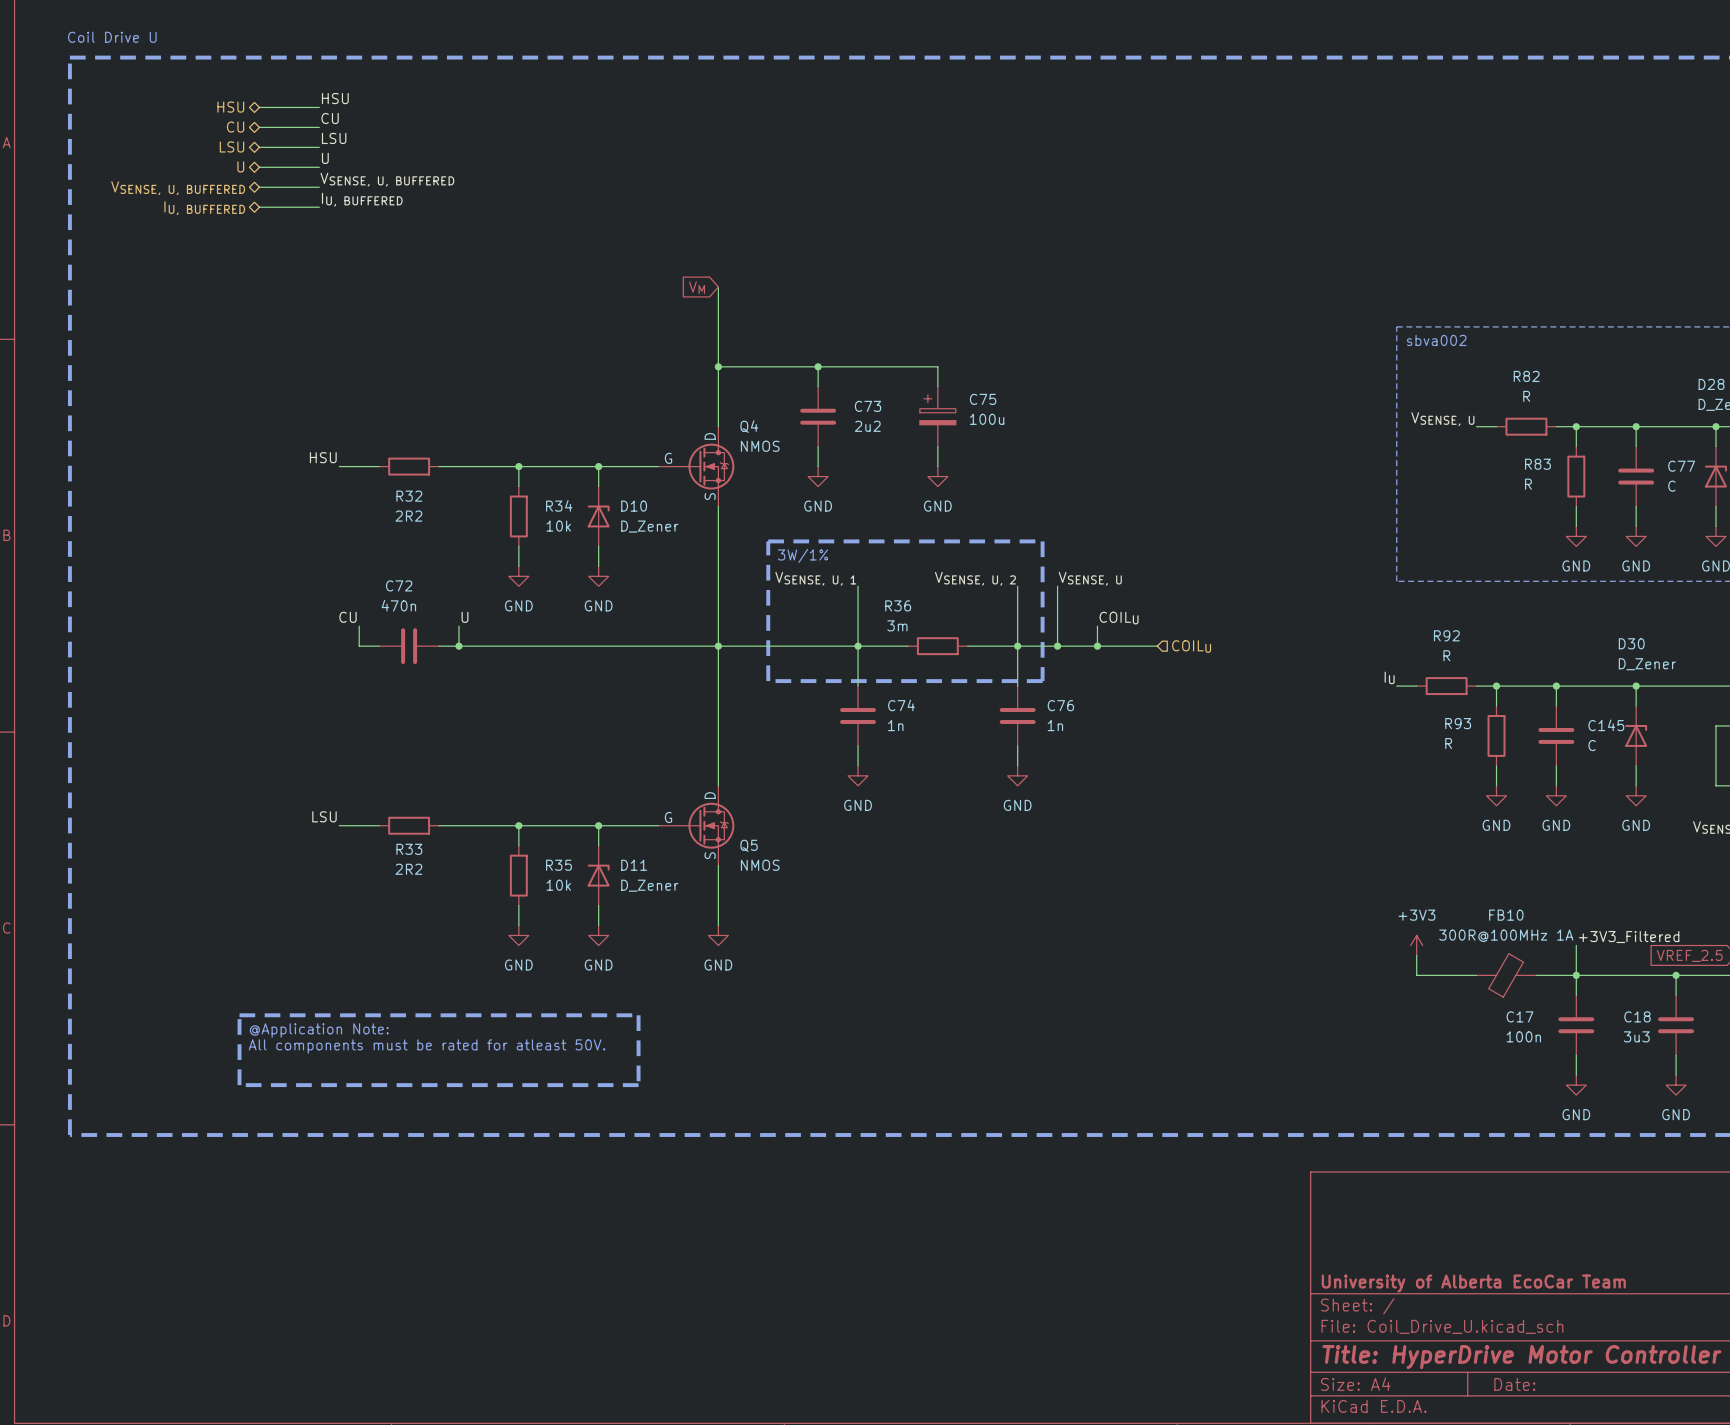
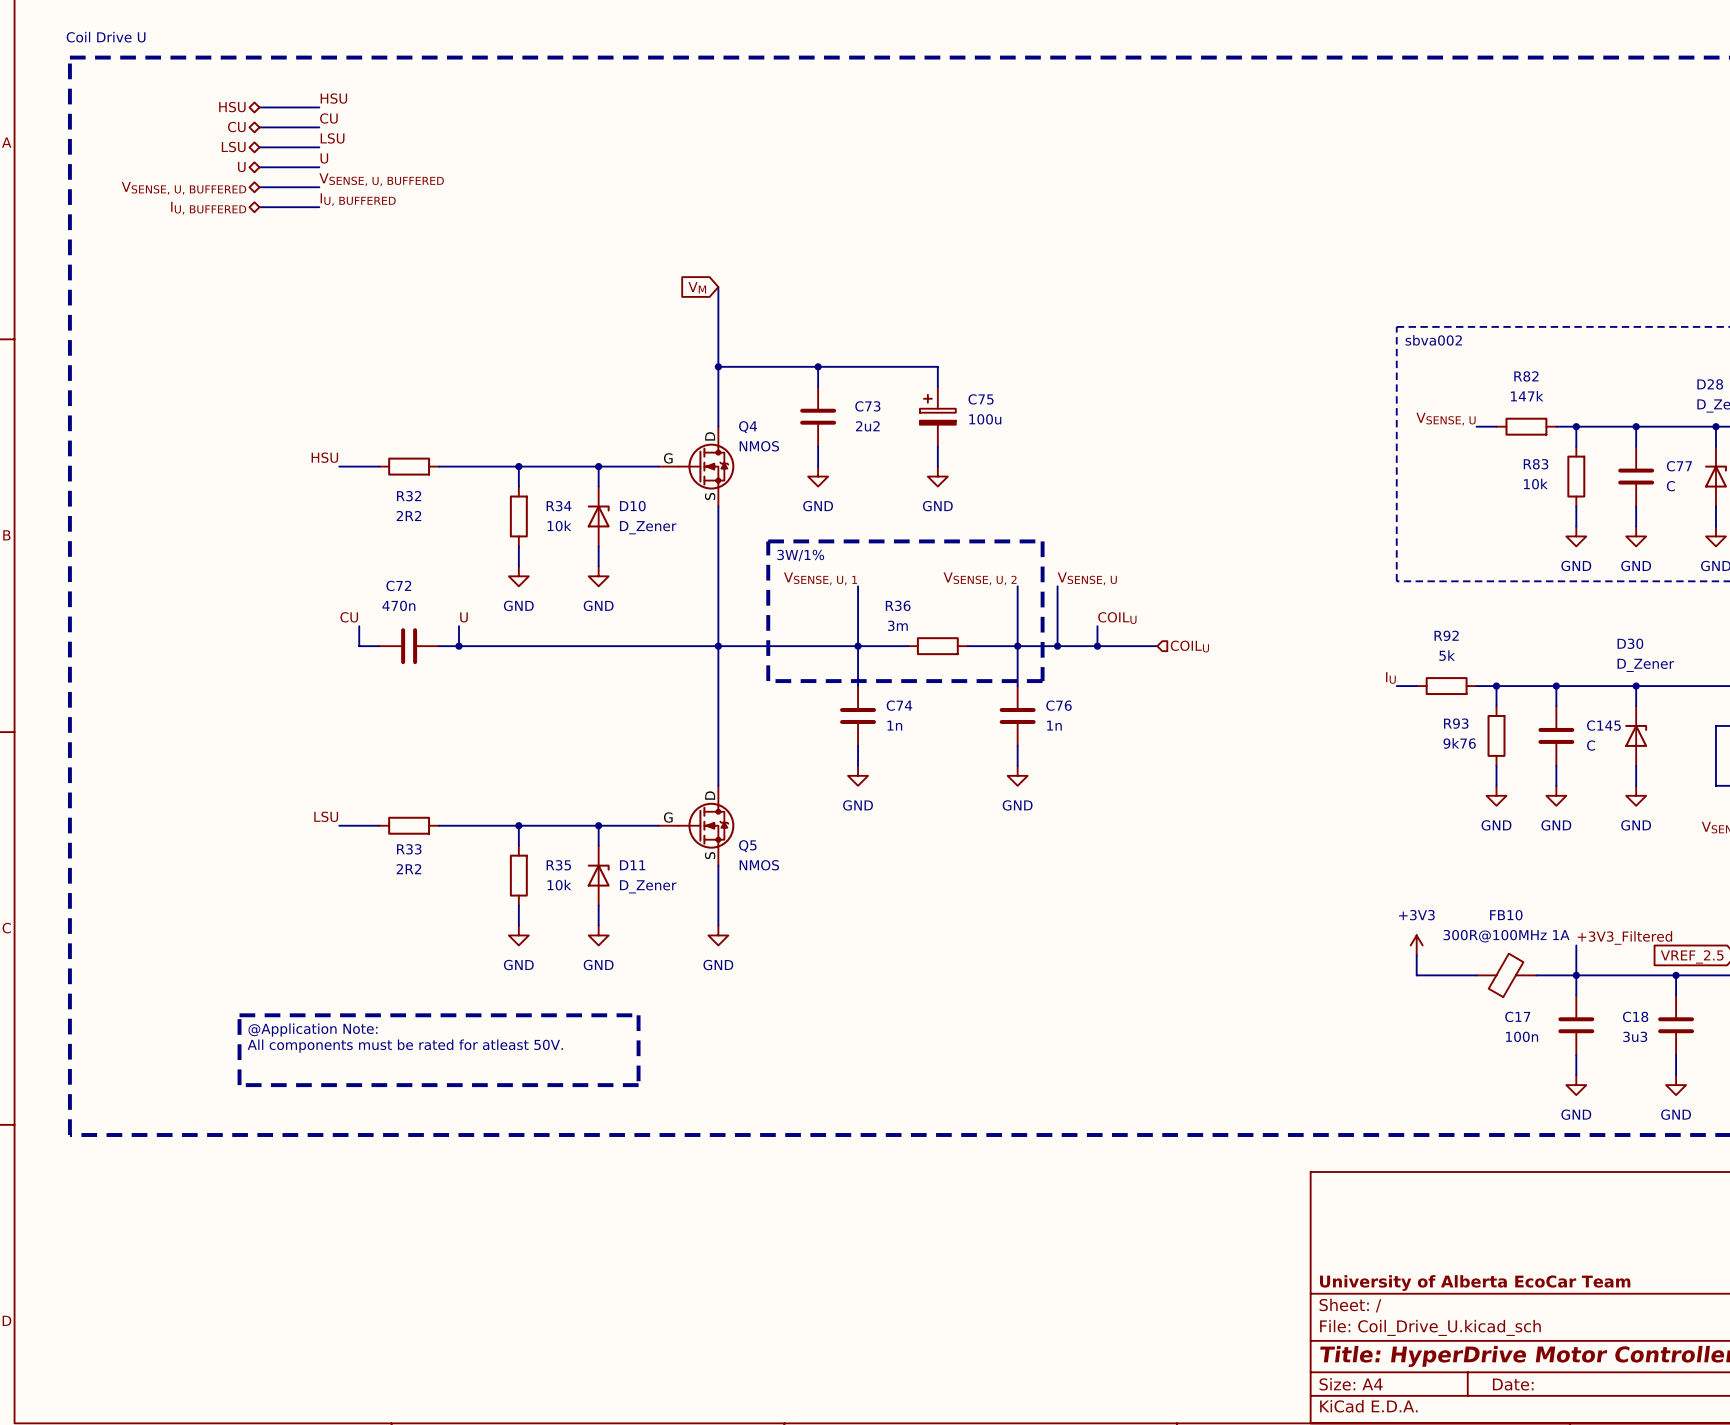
R82 value: R (1526, 396) -> 147k (1527, 396)
R83 value: R (1528, 484) -> 10k (1535, 484)
R92 value: R (1446, 655) -> 5k (1447, 655)
R93 value: R (1448, 743) -> 9k76 (1459, 743)

